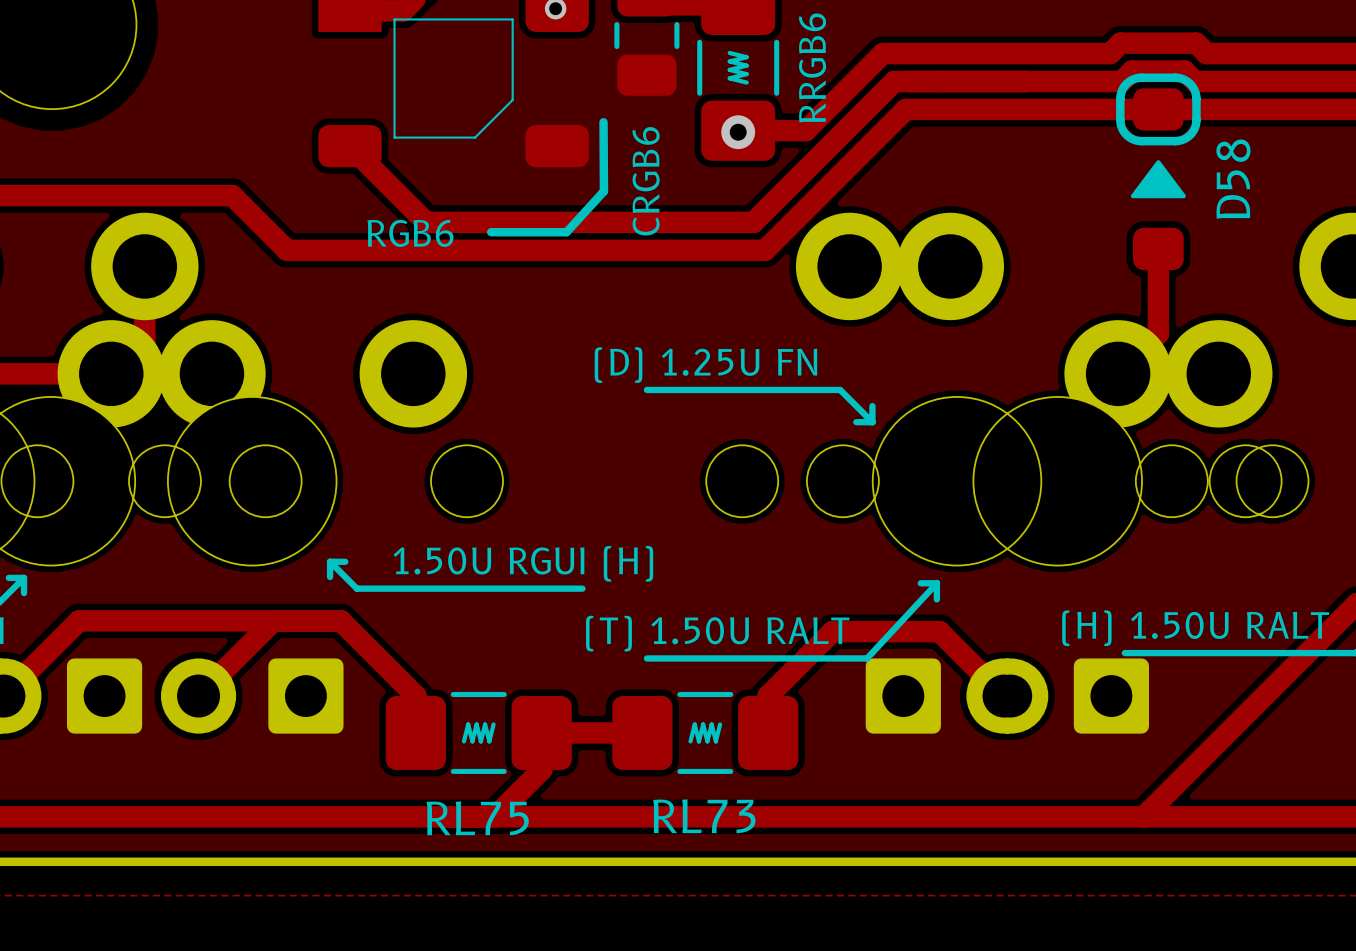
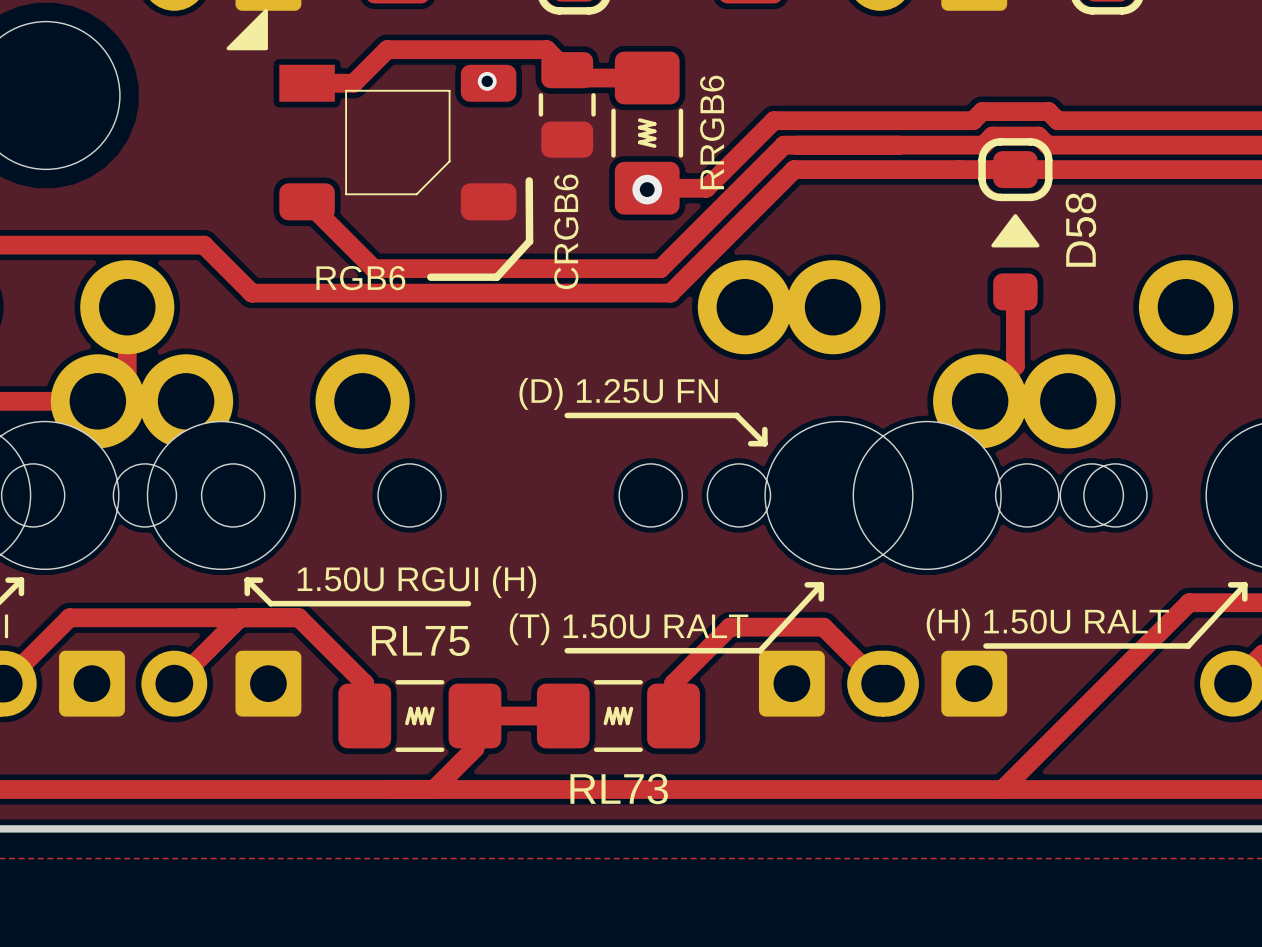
line: (330, 561) (330, 576) -> (247, 580) (247, 593)
line: (330, 561) (356, 588) (582, 588) -> (247, 580) (270, 603) (468, 603)
line: (330, 561) (345, 561) -> (247, 580) (260, 580)
text position: 1.50U RGUI (H) (523, 563) -> 1.50U RGUI (H) (416, 582)
RL75 name position: RL75 (477, 818) -> RL75 (420, 641)

